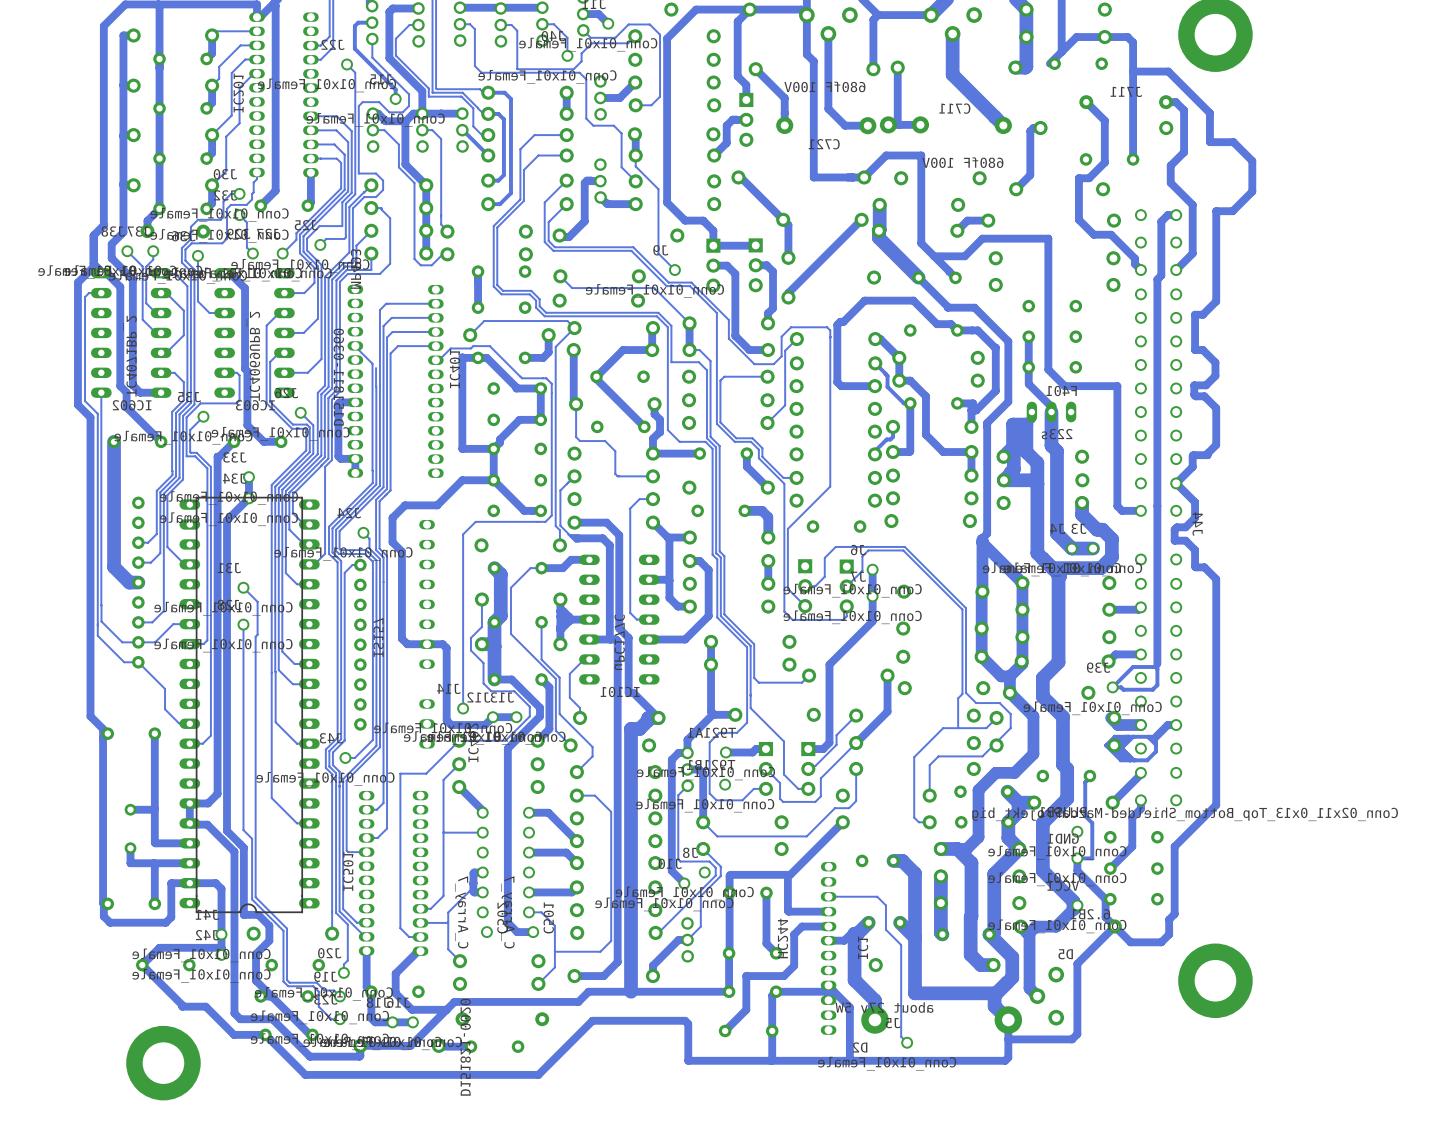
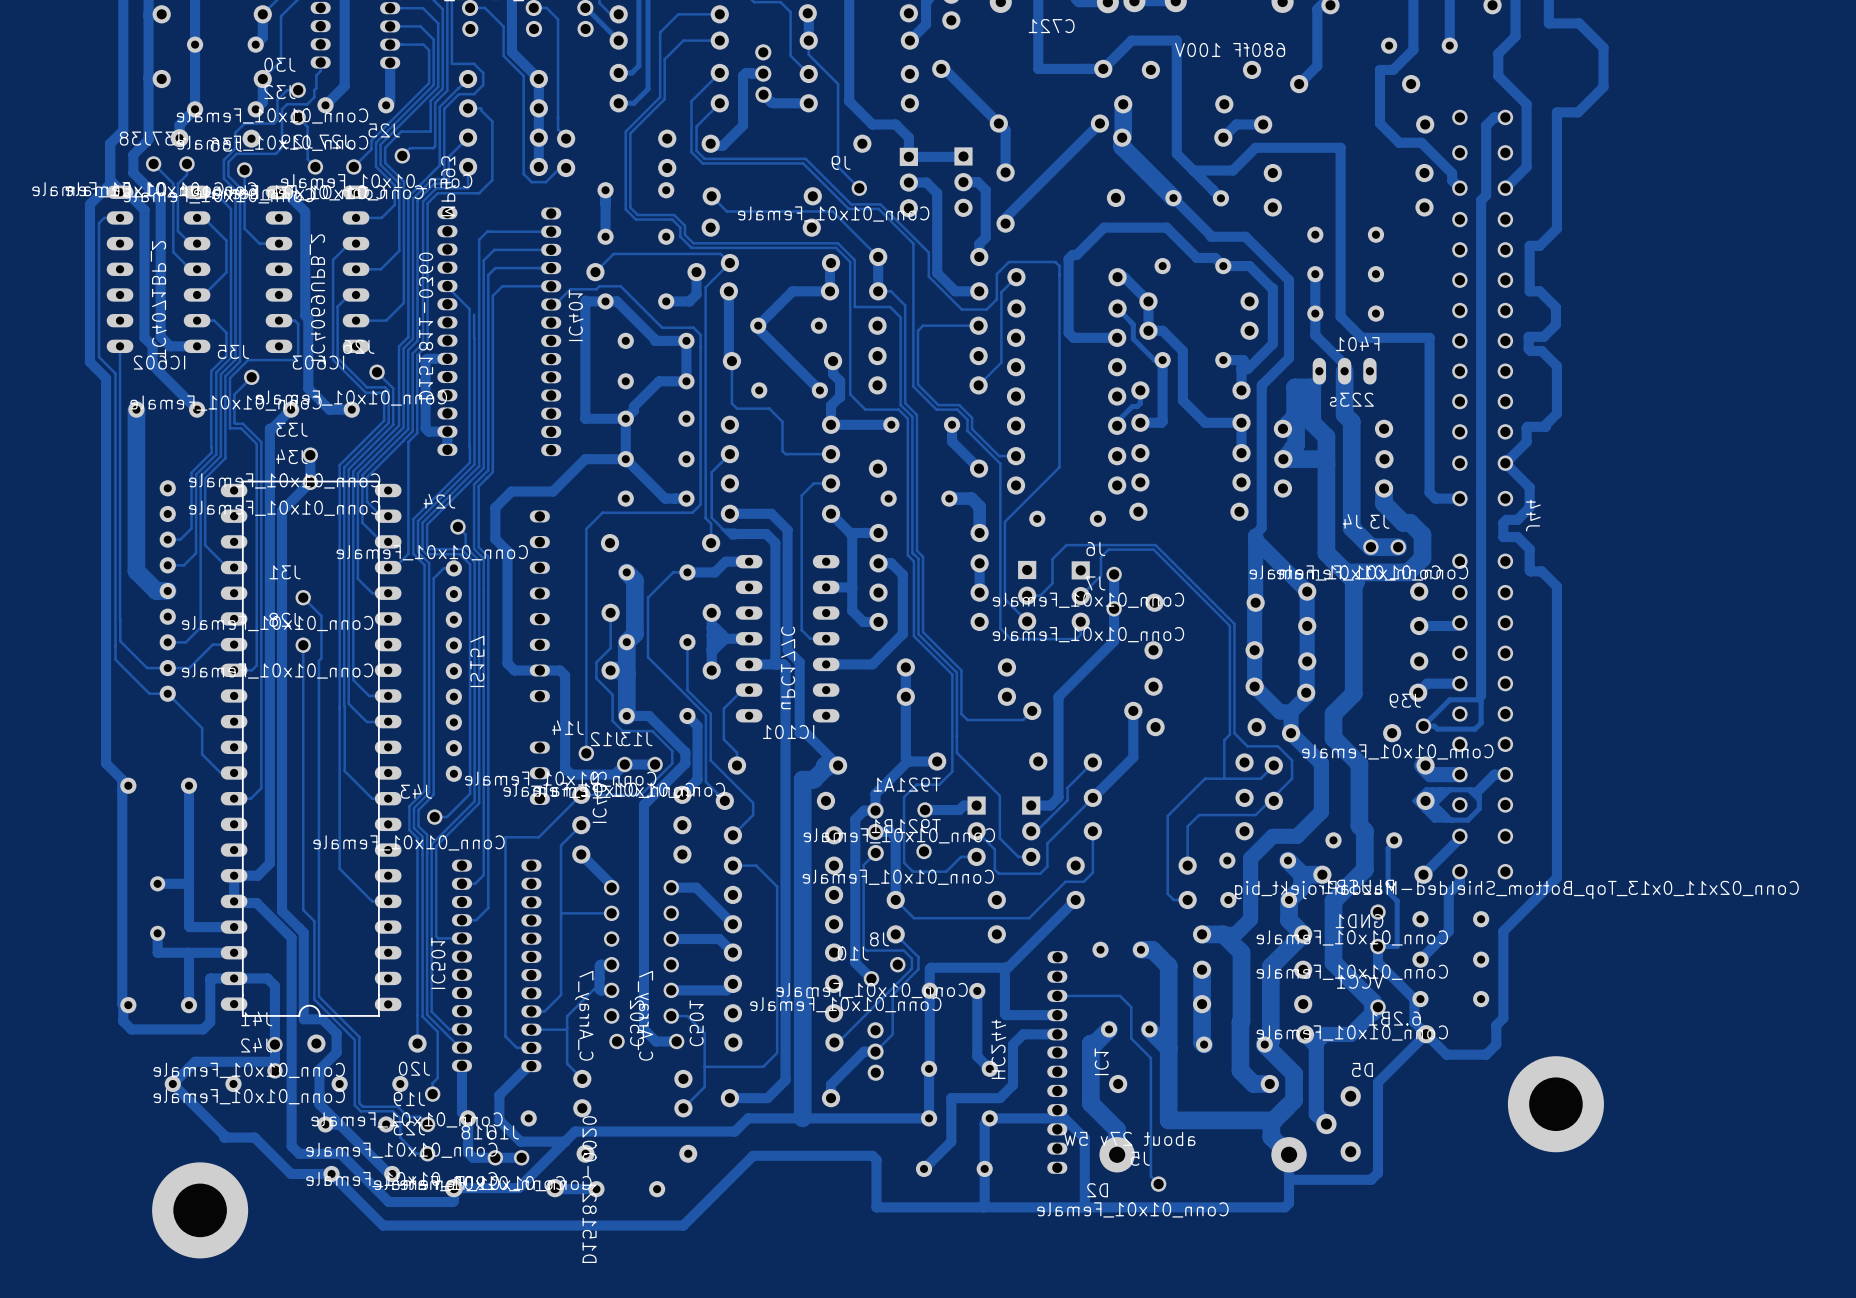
track: (854, 933) (851, 933) (844, 940) (828, 940) -> none

